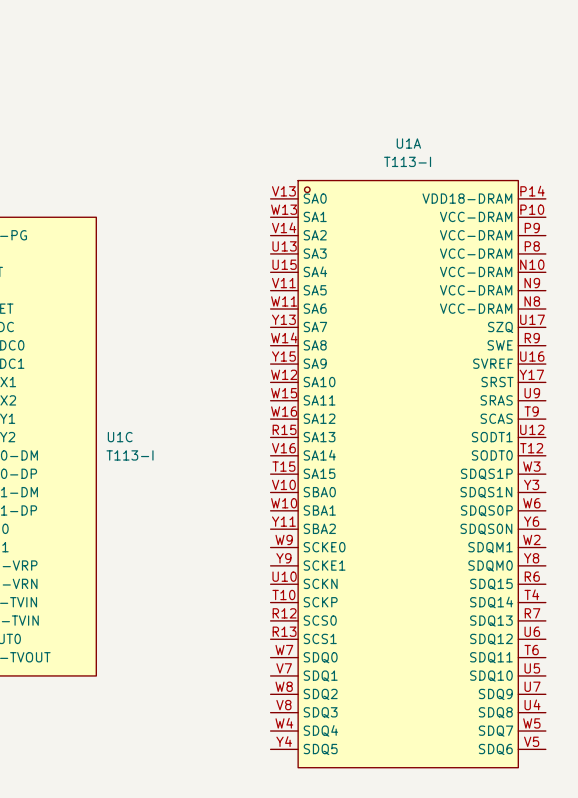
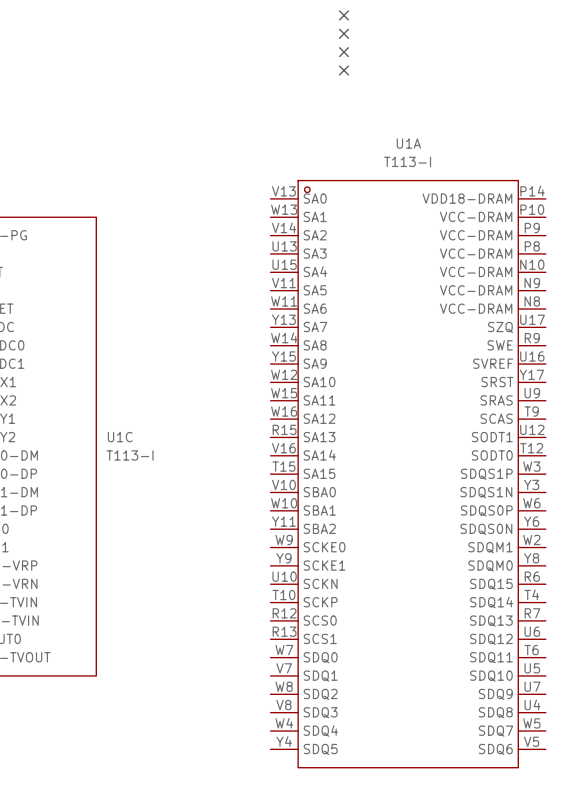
no-connect mark: none -> (344, 15)
no-connect mark: none -> (344, 33)
no-connect mark: none -> (344, 52)
no-connect mark: none -> (344, 70)

